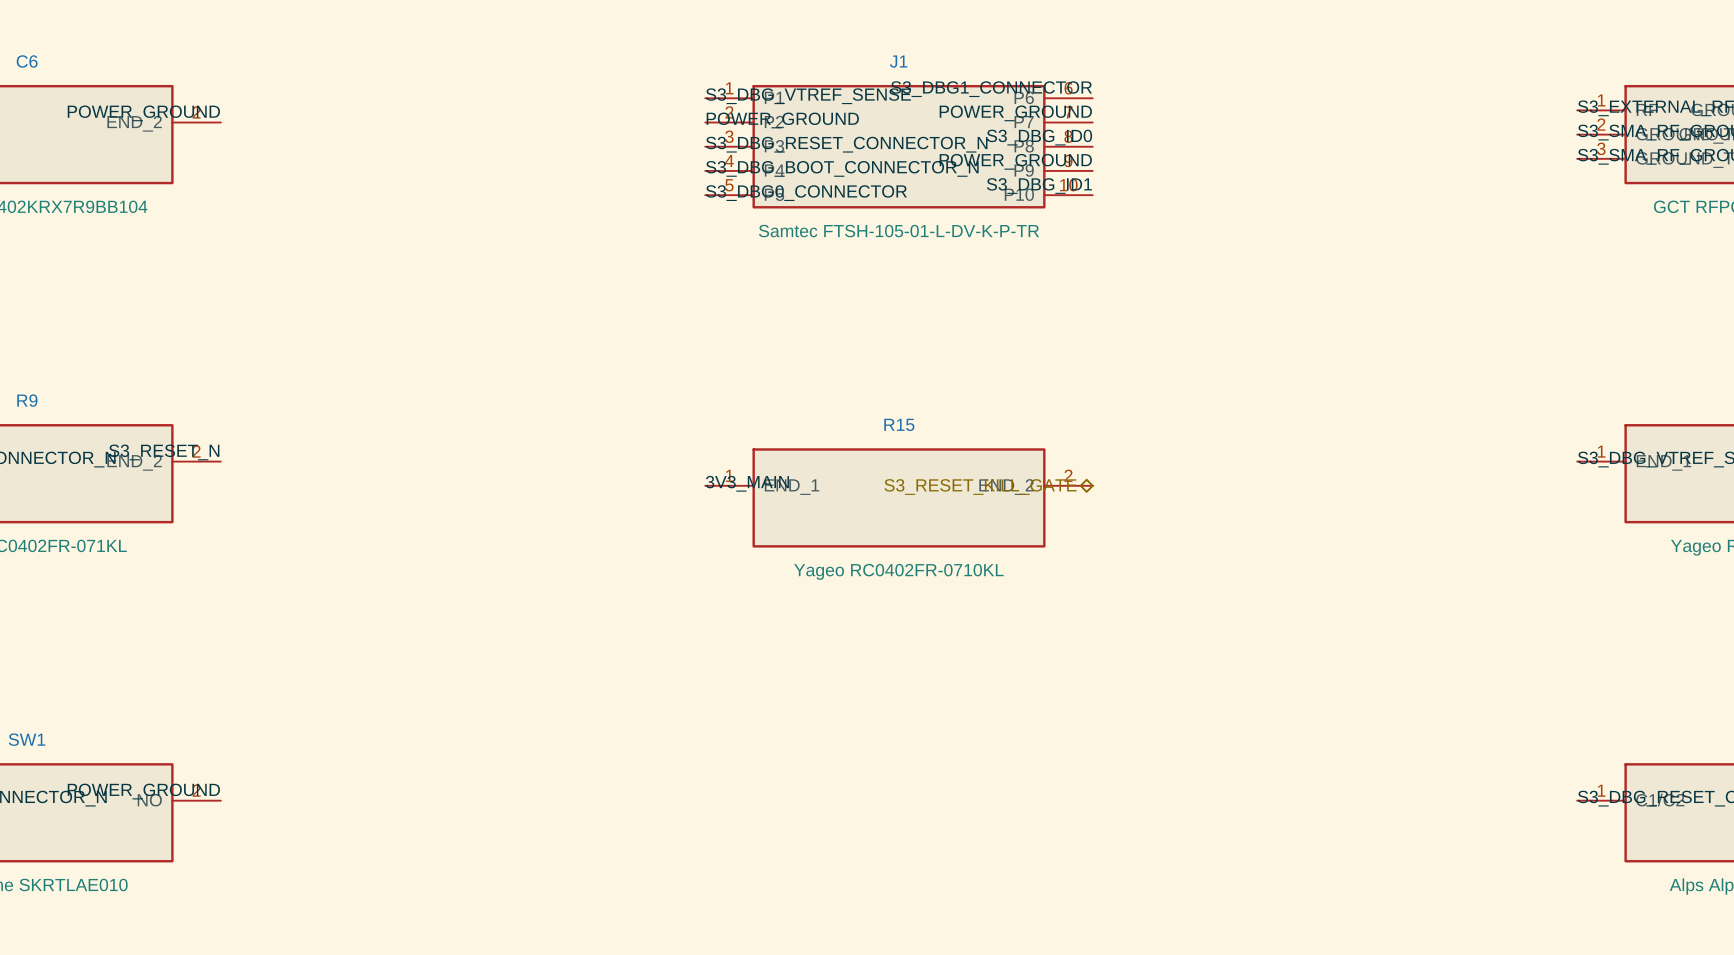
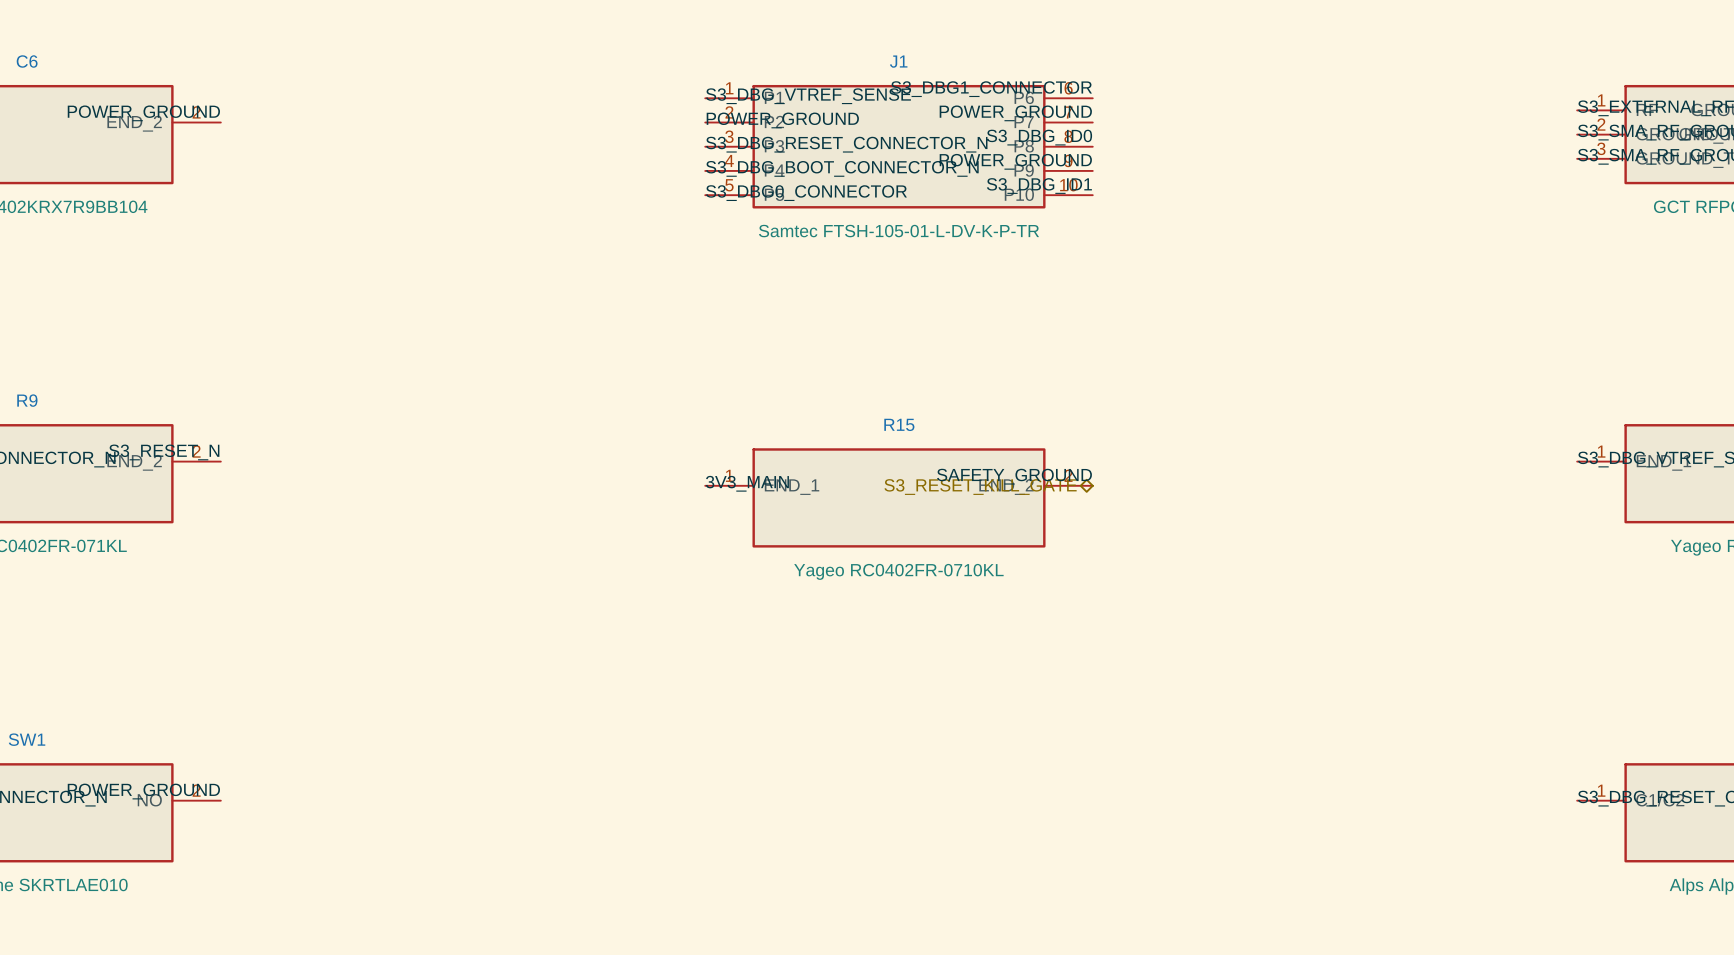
label: none -> SAFETY_GROUND (1014, 476)

